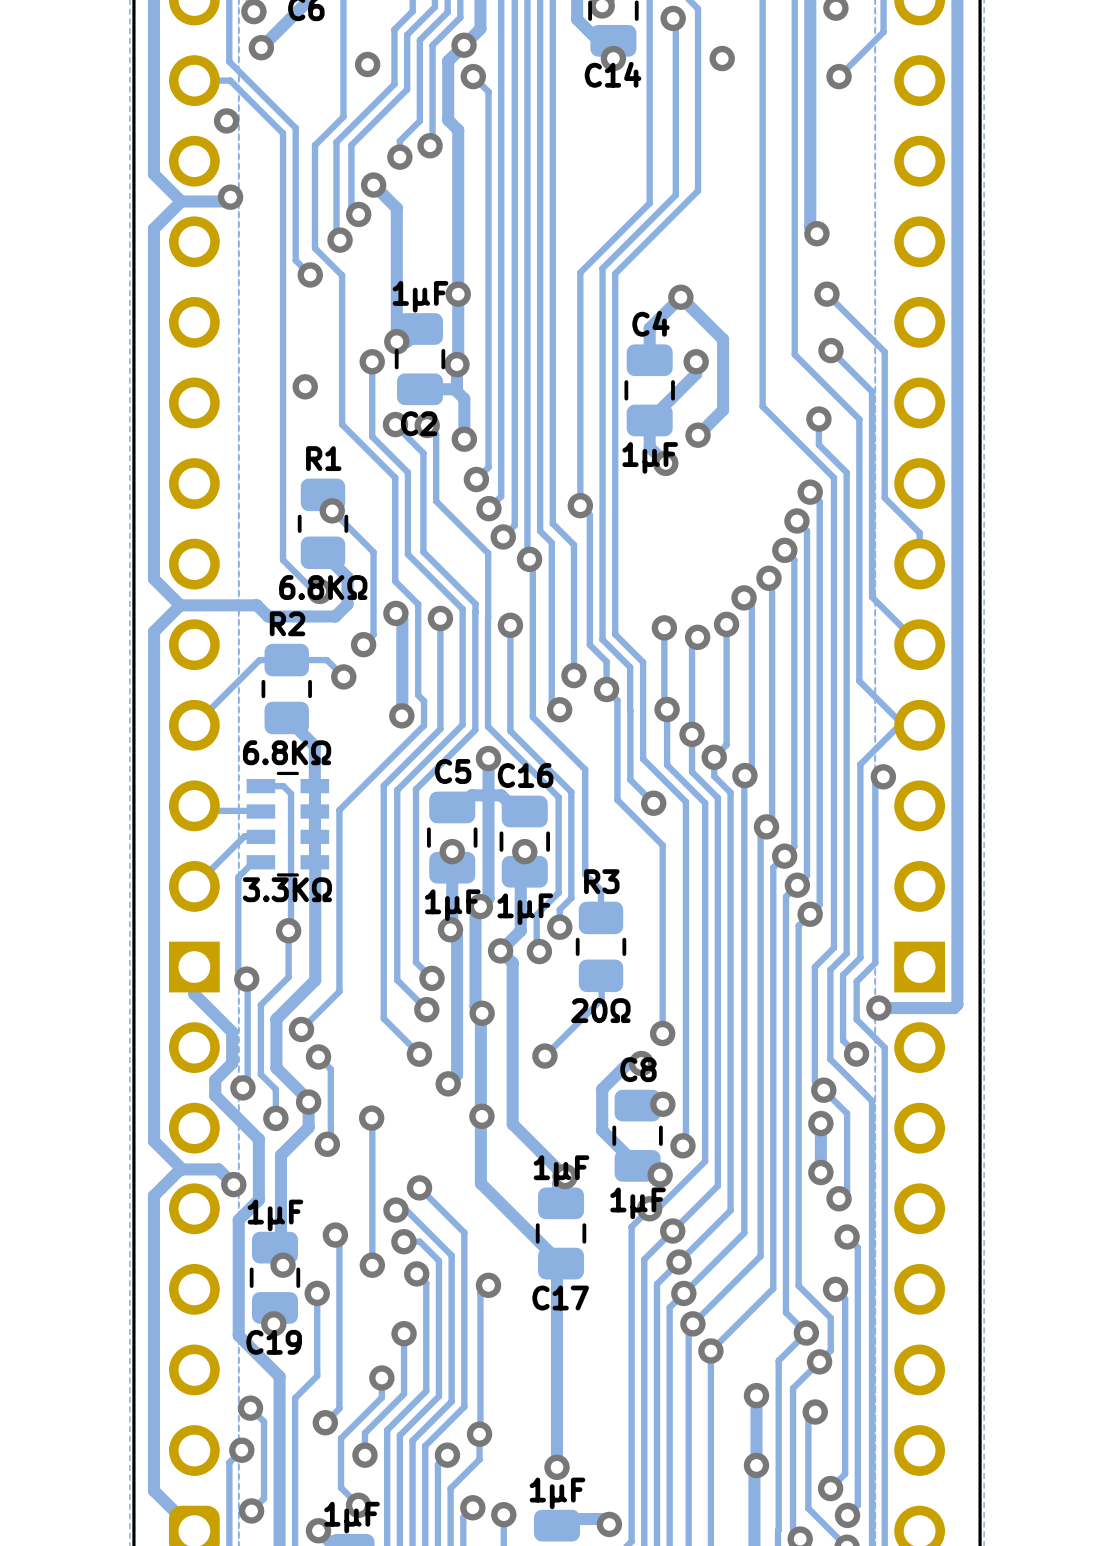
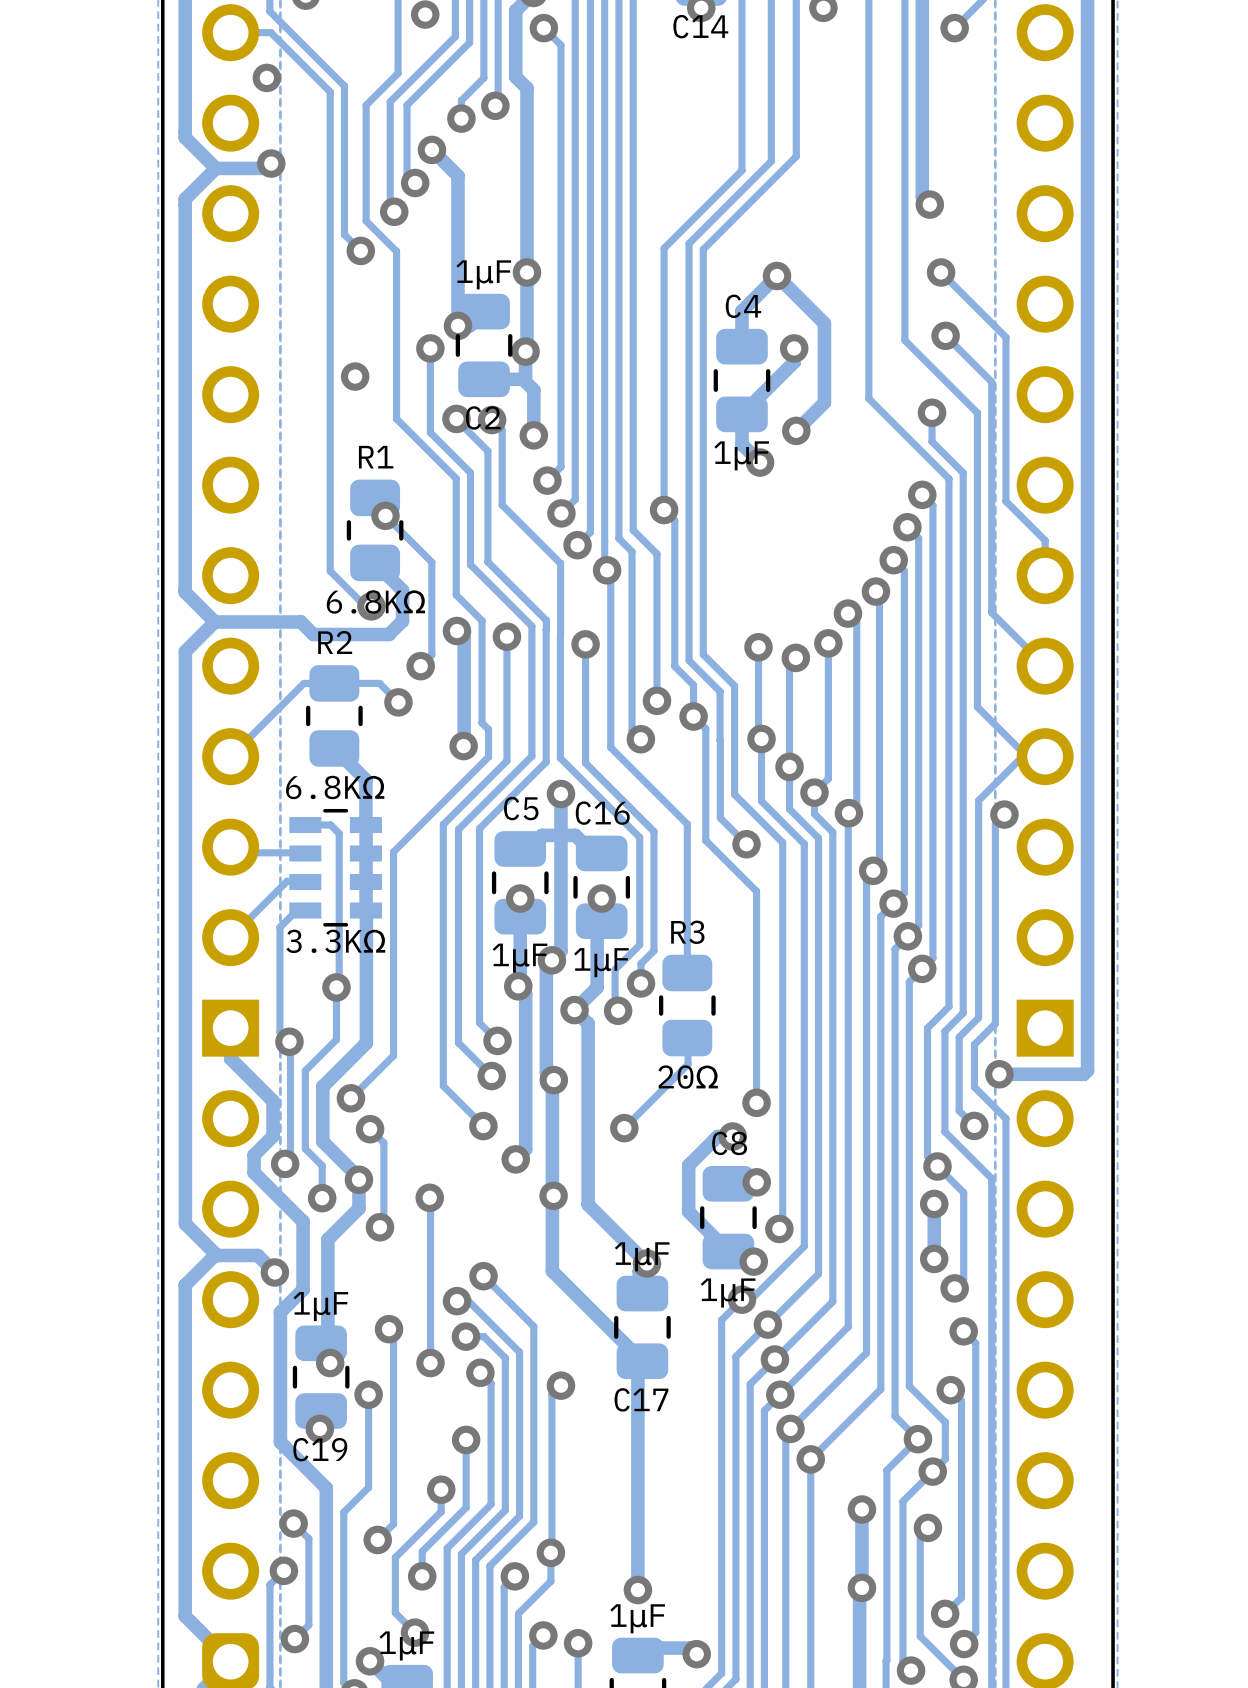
track: (585, 769) (585, 874) (601, 890) -> (669, 806) (687, 824) (687, 941)

